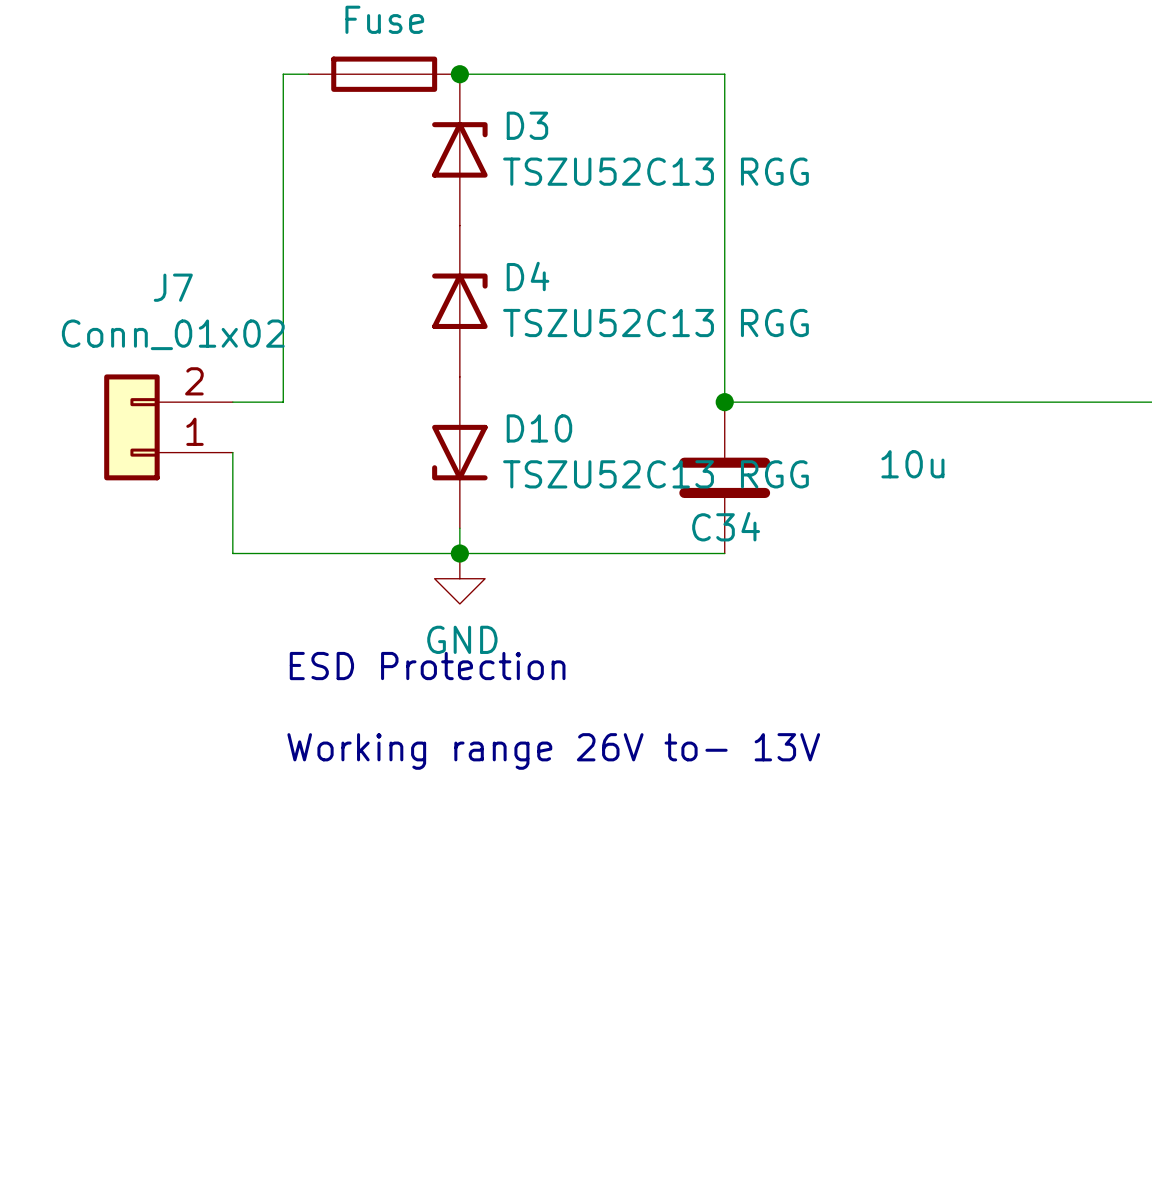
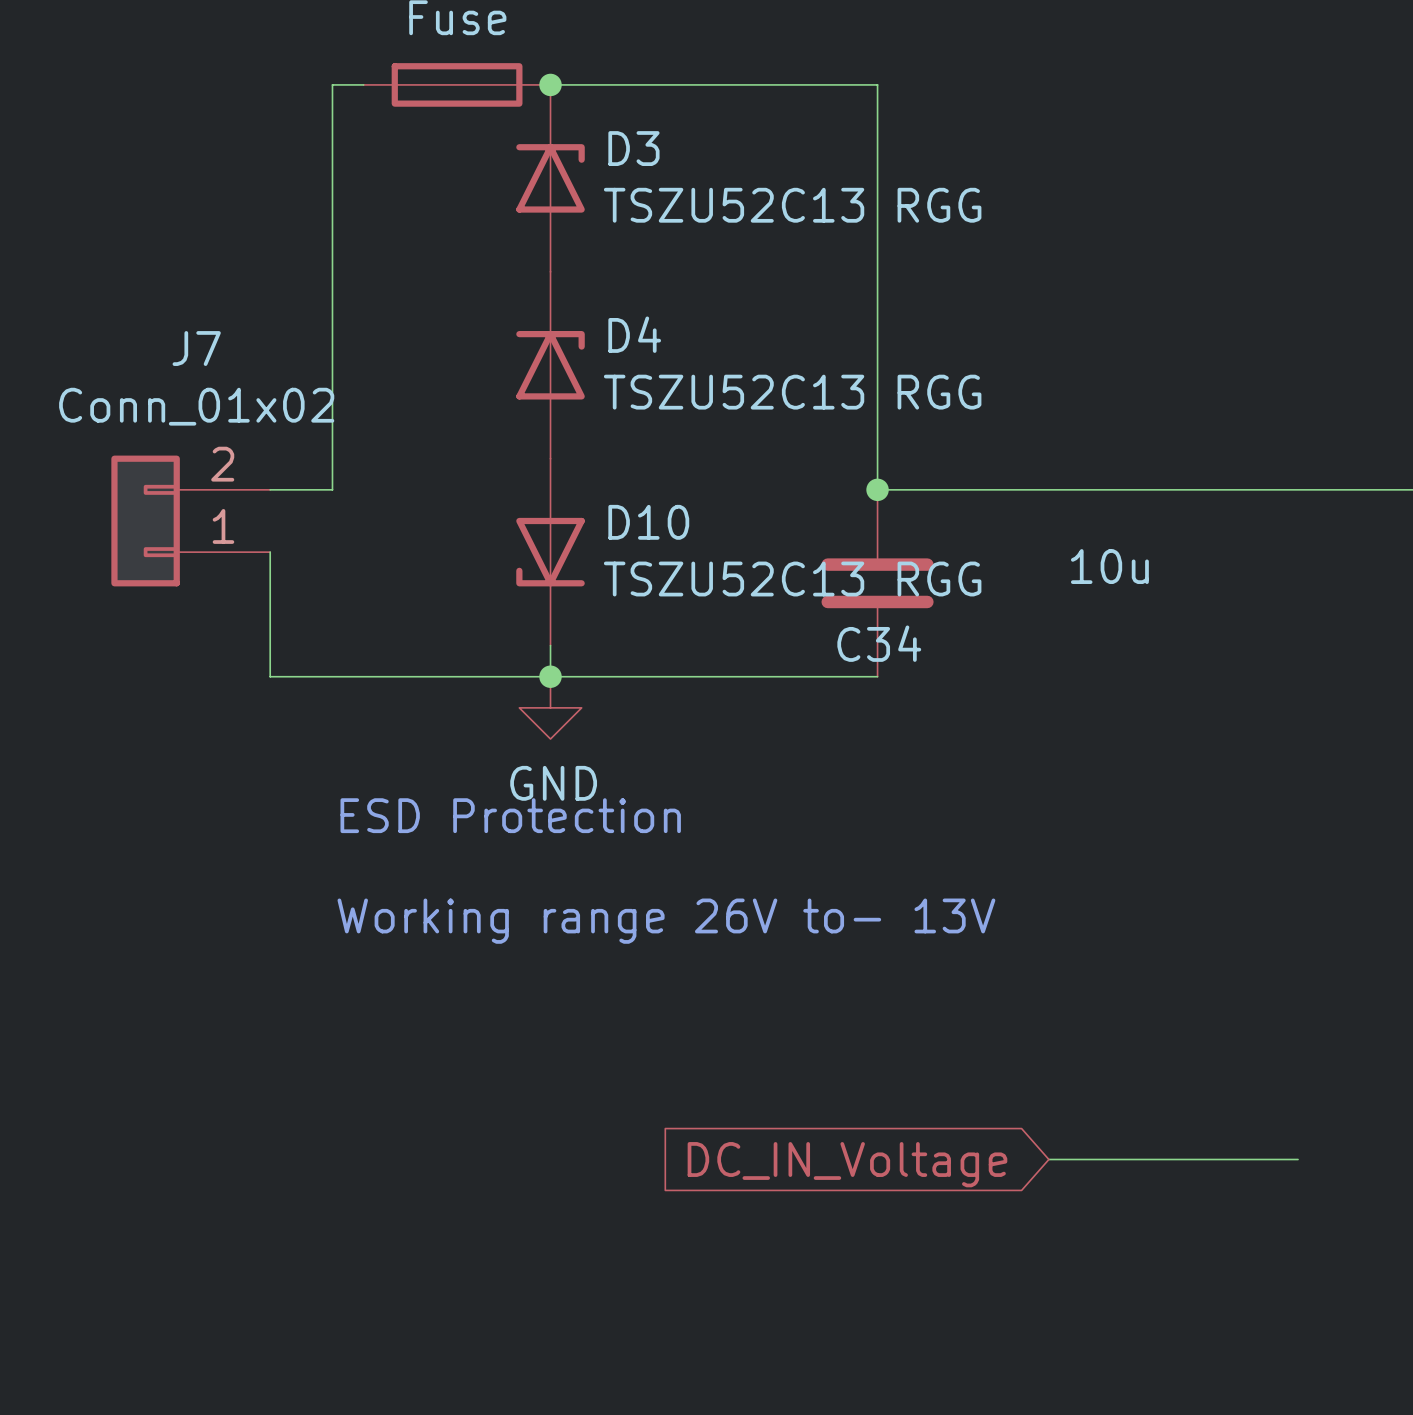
wire: none -> (1048, 1159) (1298, 1159)
global label: none -> DC_IN_Voltage (847, 1164)

